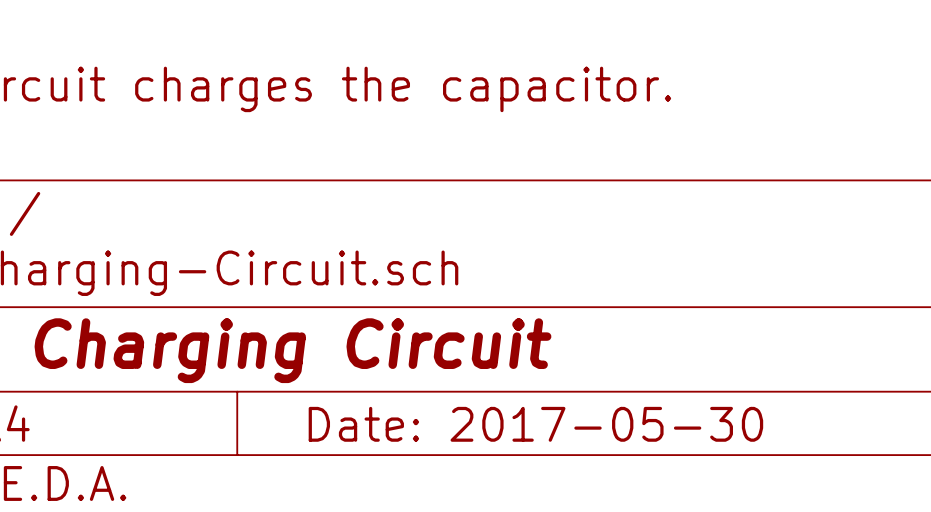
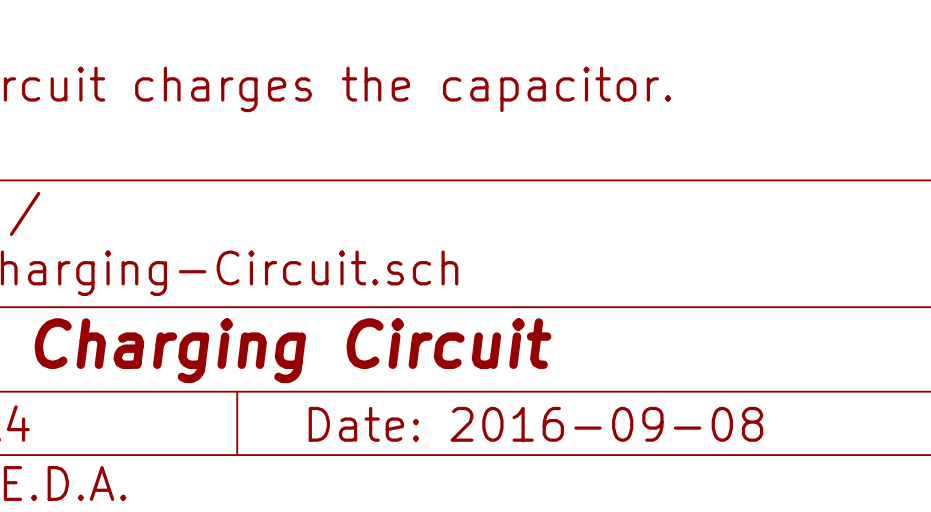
title block: Date: 2017-05-30 (535, 424) -> Date: 2016-09-08 (535, 424)

